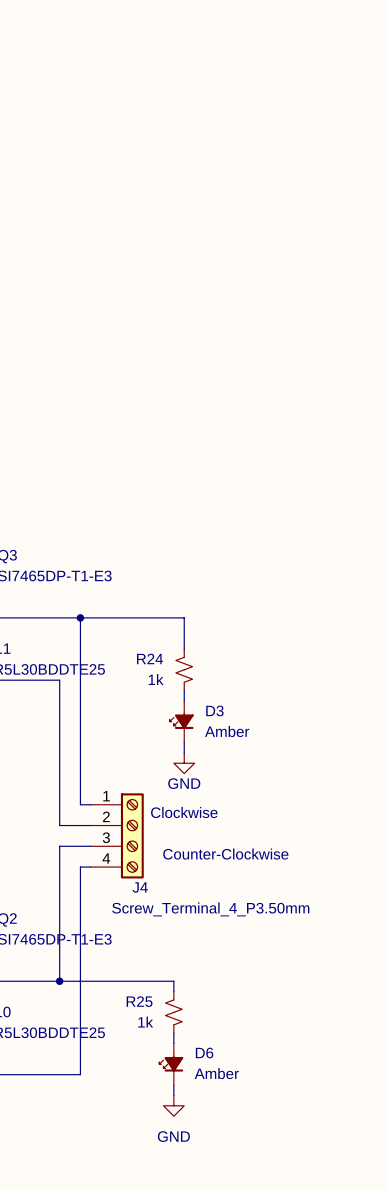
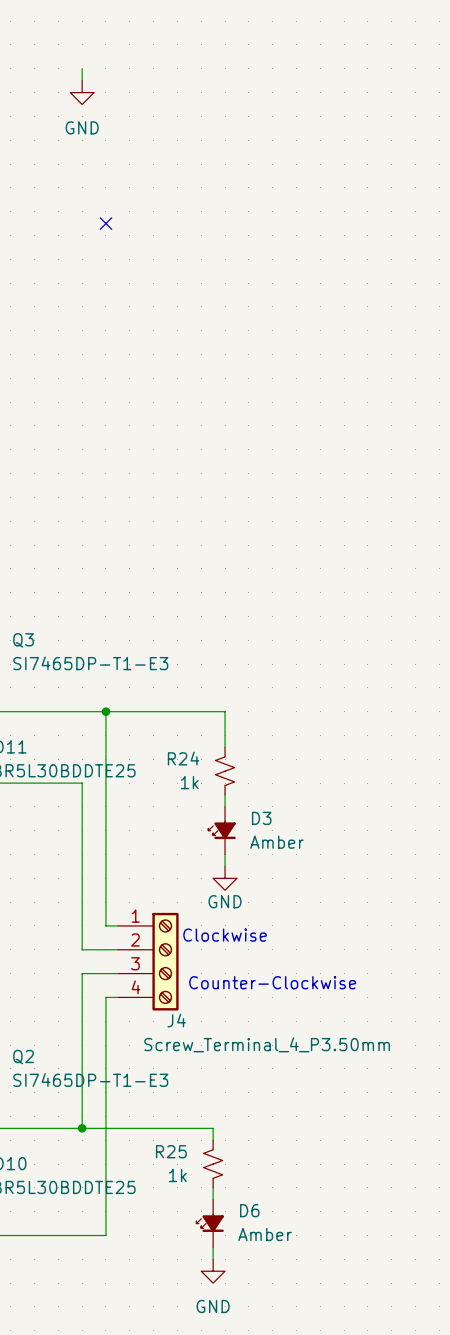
wire: none -> (82, 68) (82, 80)
power symbol: none -> GND (82, 92)
no-connect mark: none -> (105, 223)

